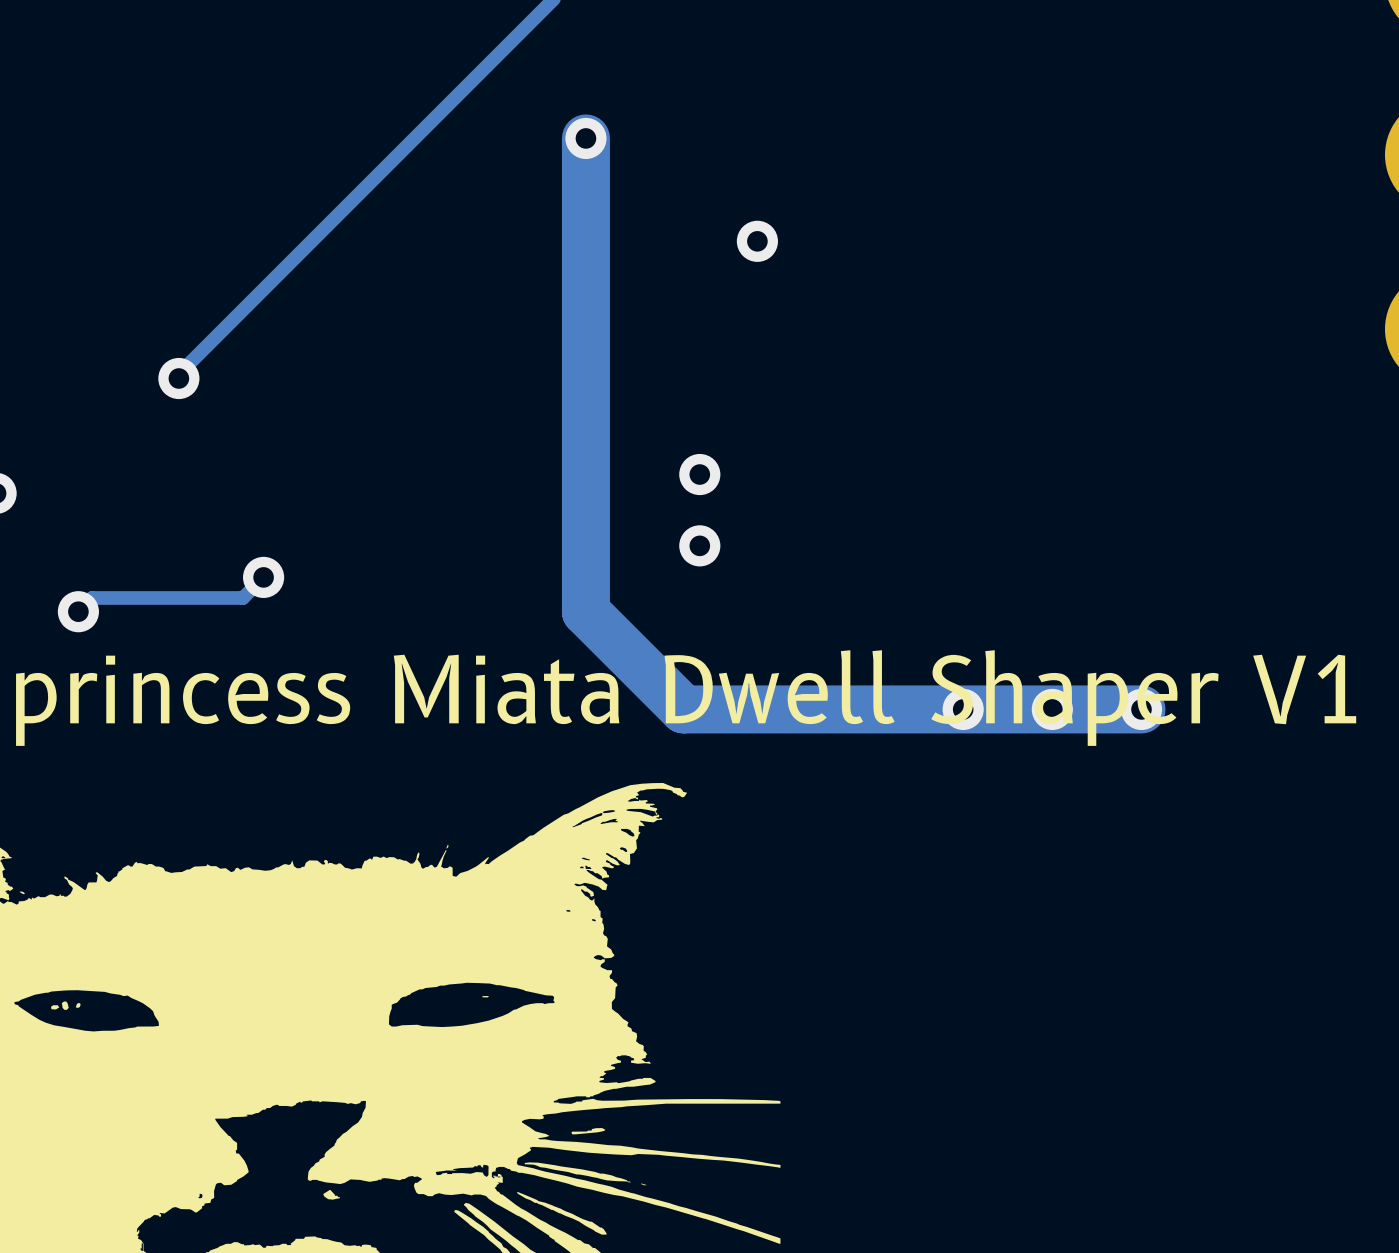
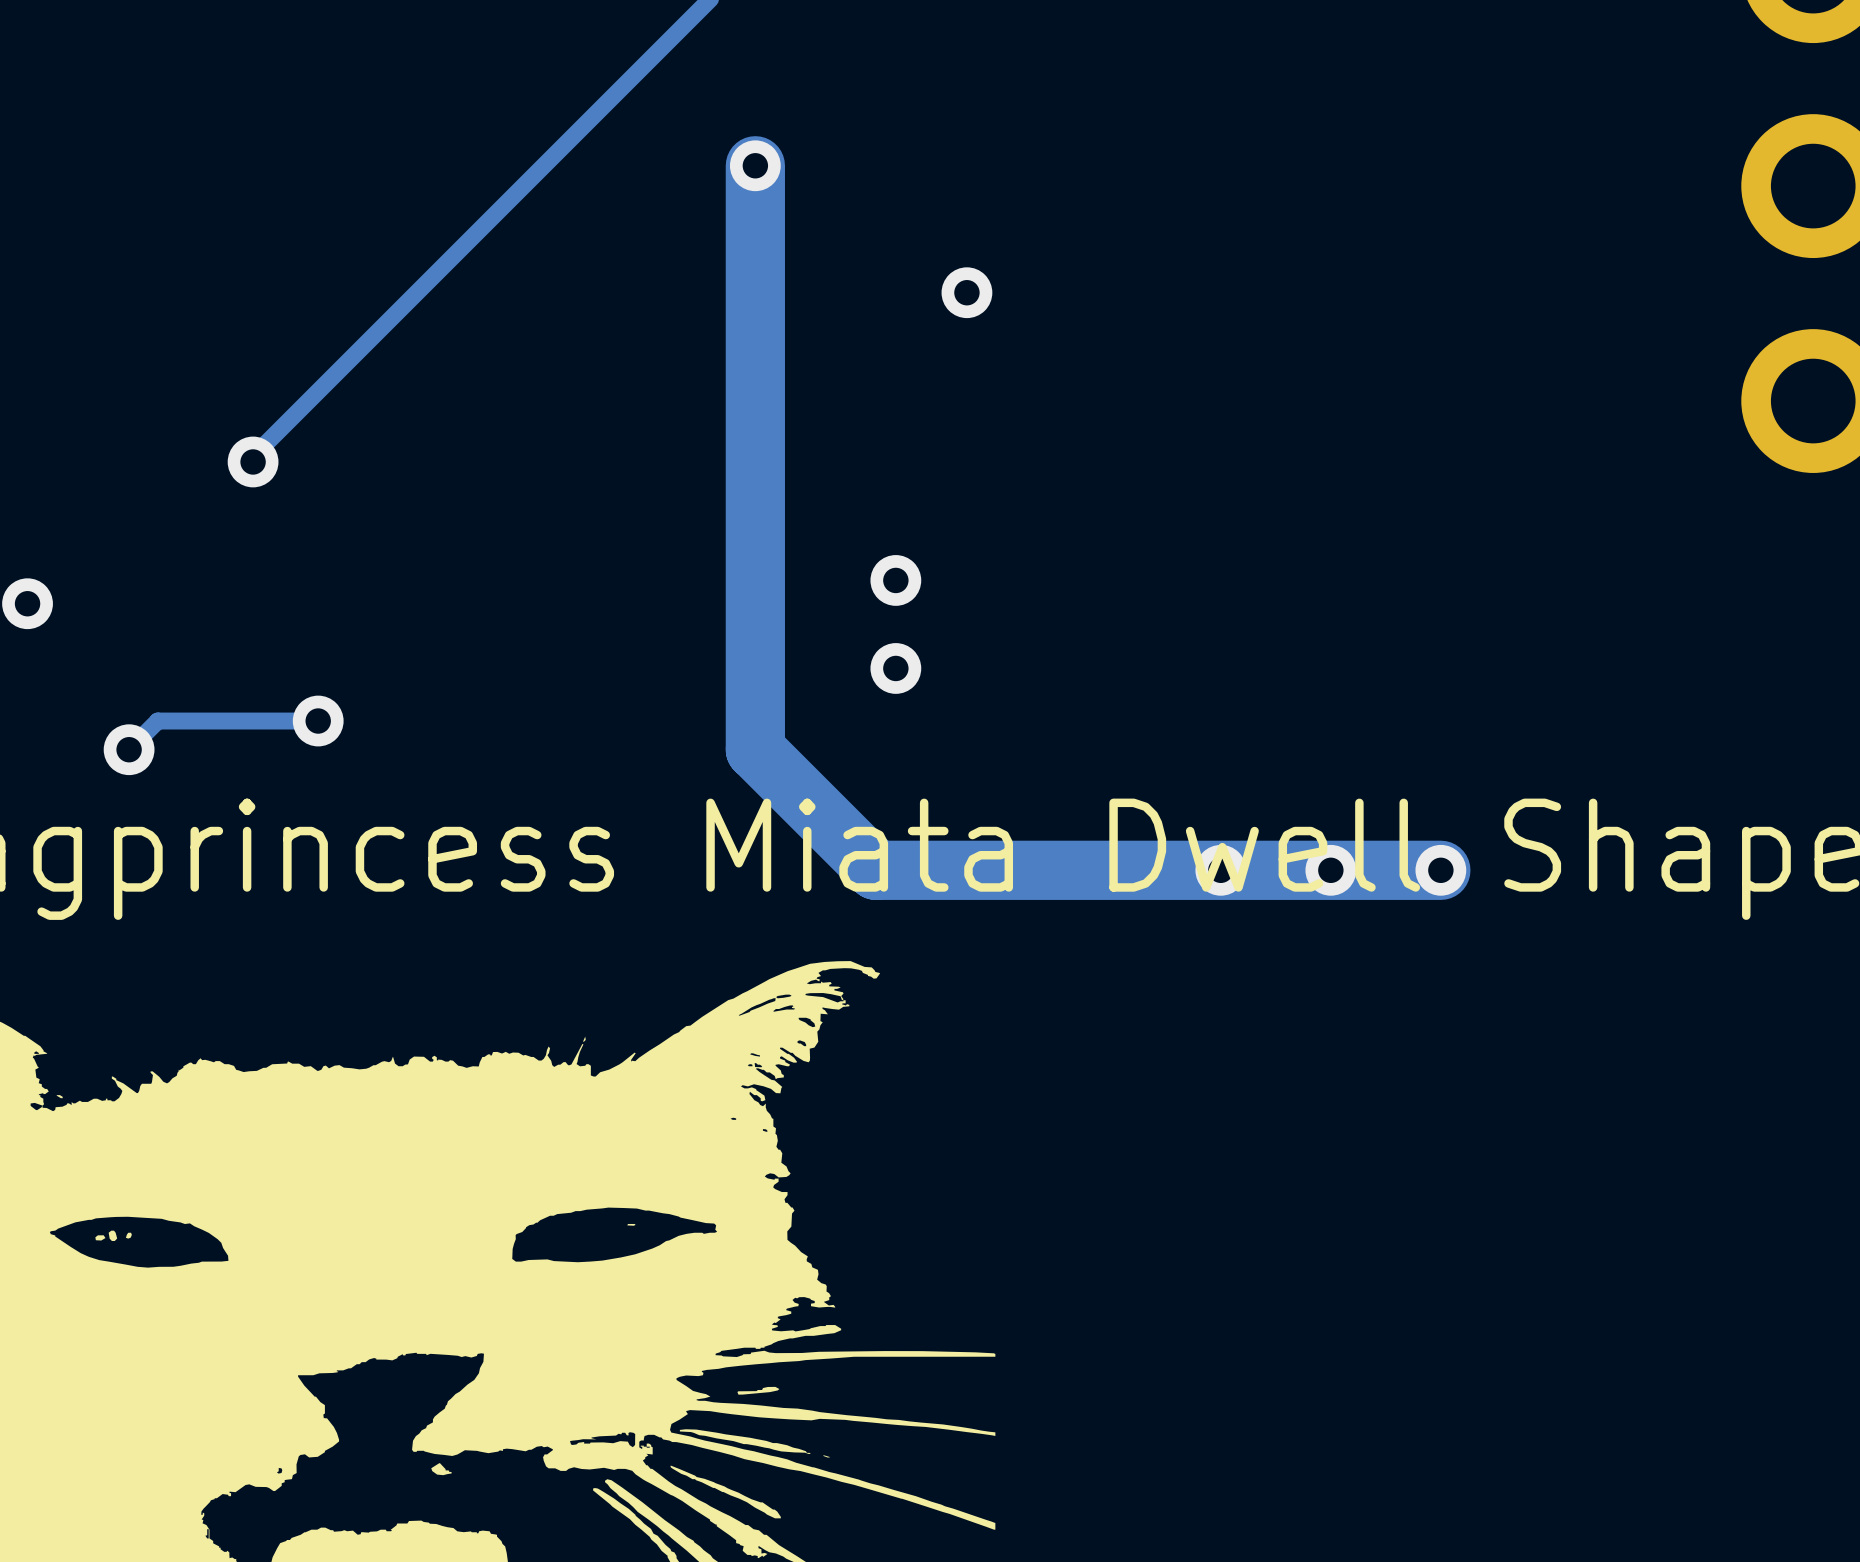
track: (263, 577) (243, 597) (92, 597) -> (318, 721) (157, 721) (146, 732)
via position: (263, 577) -> (318, 721)

